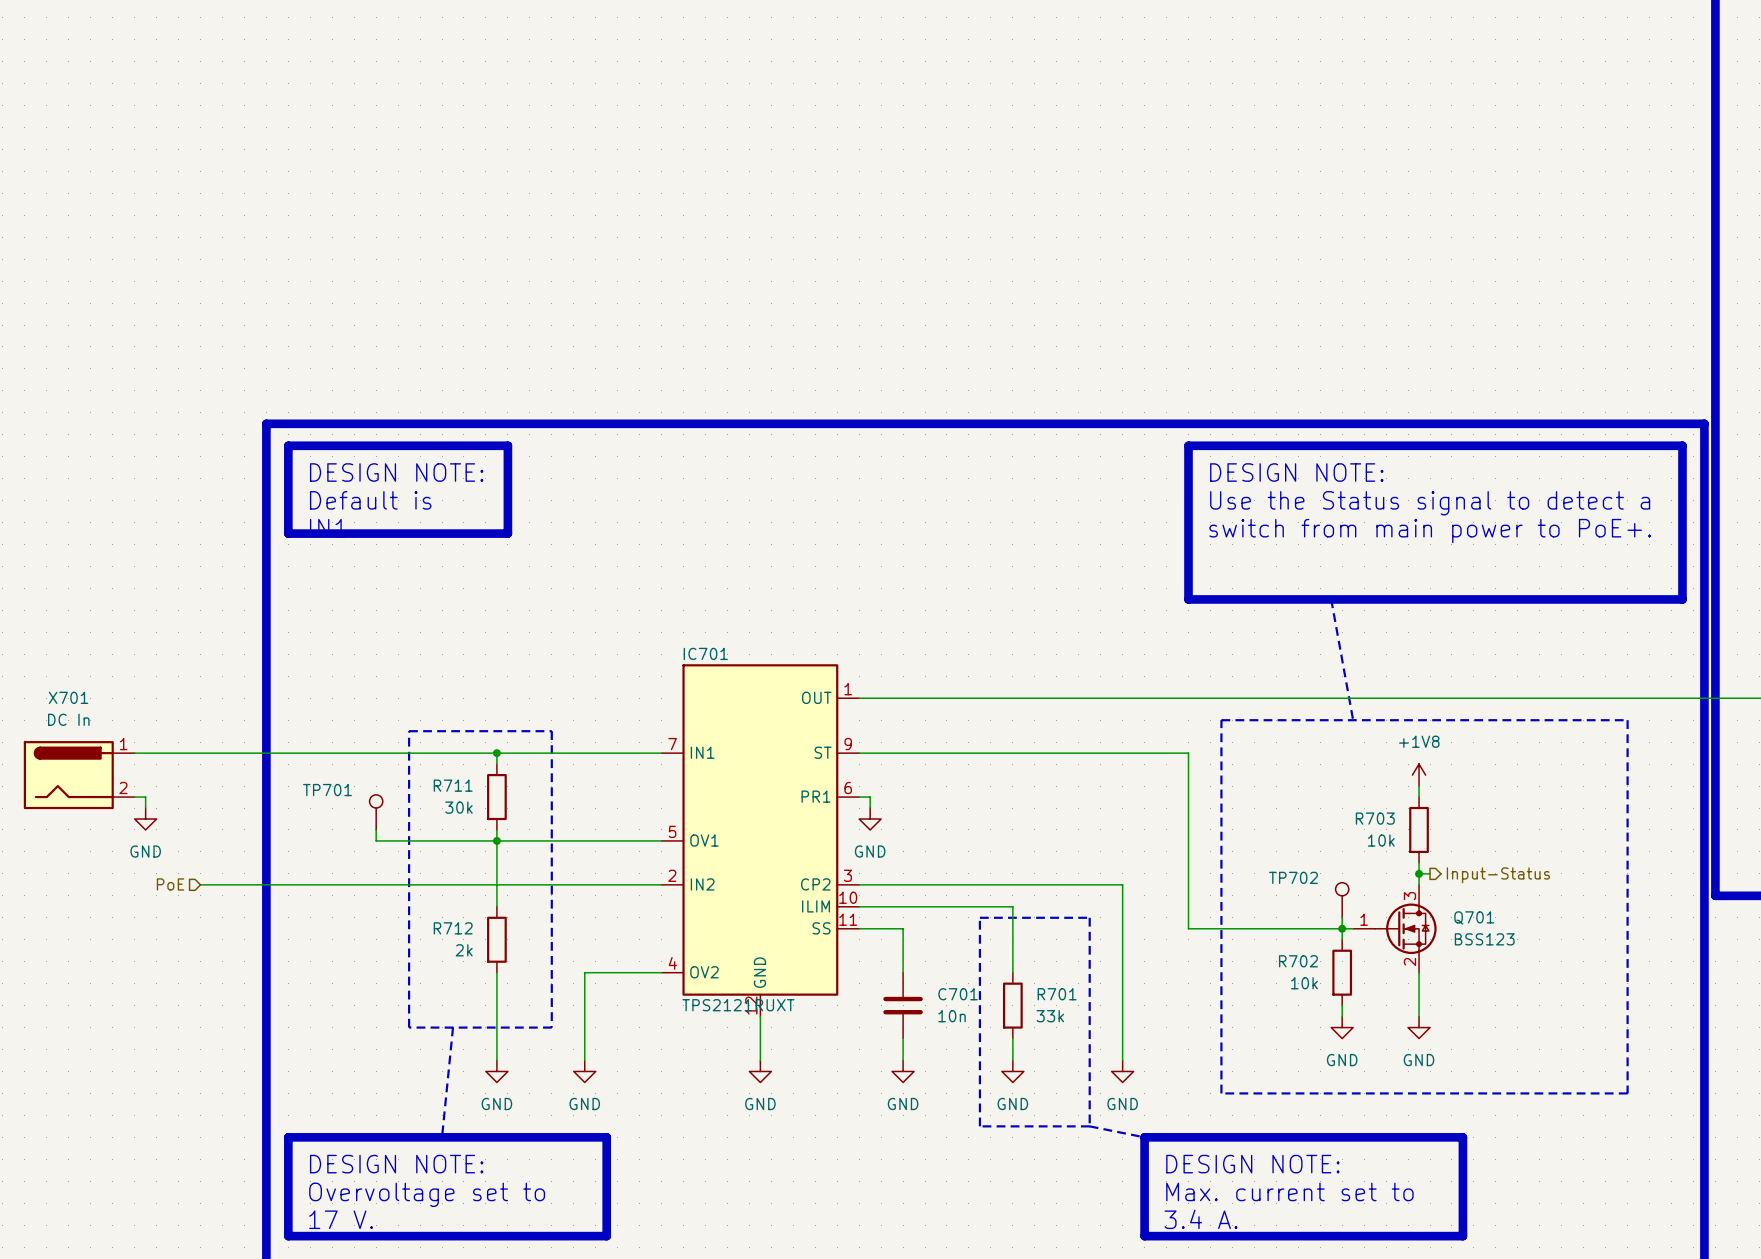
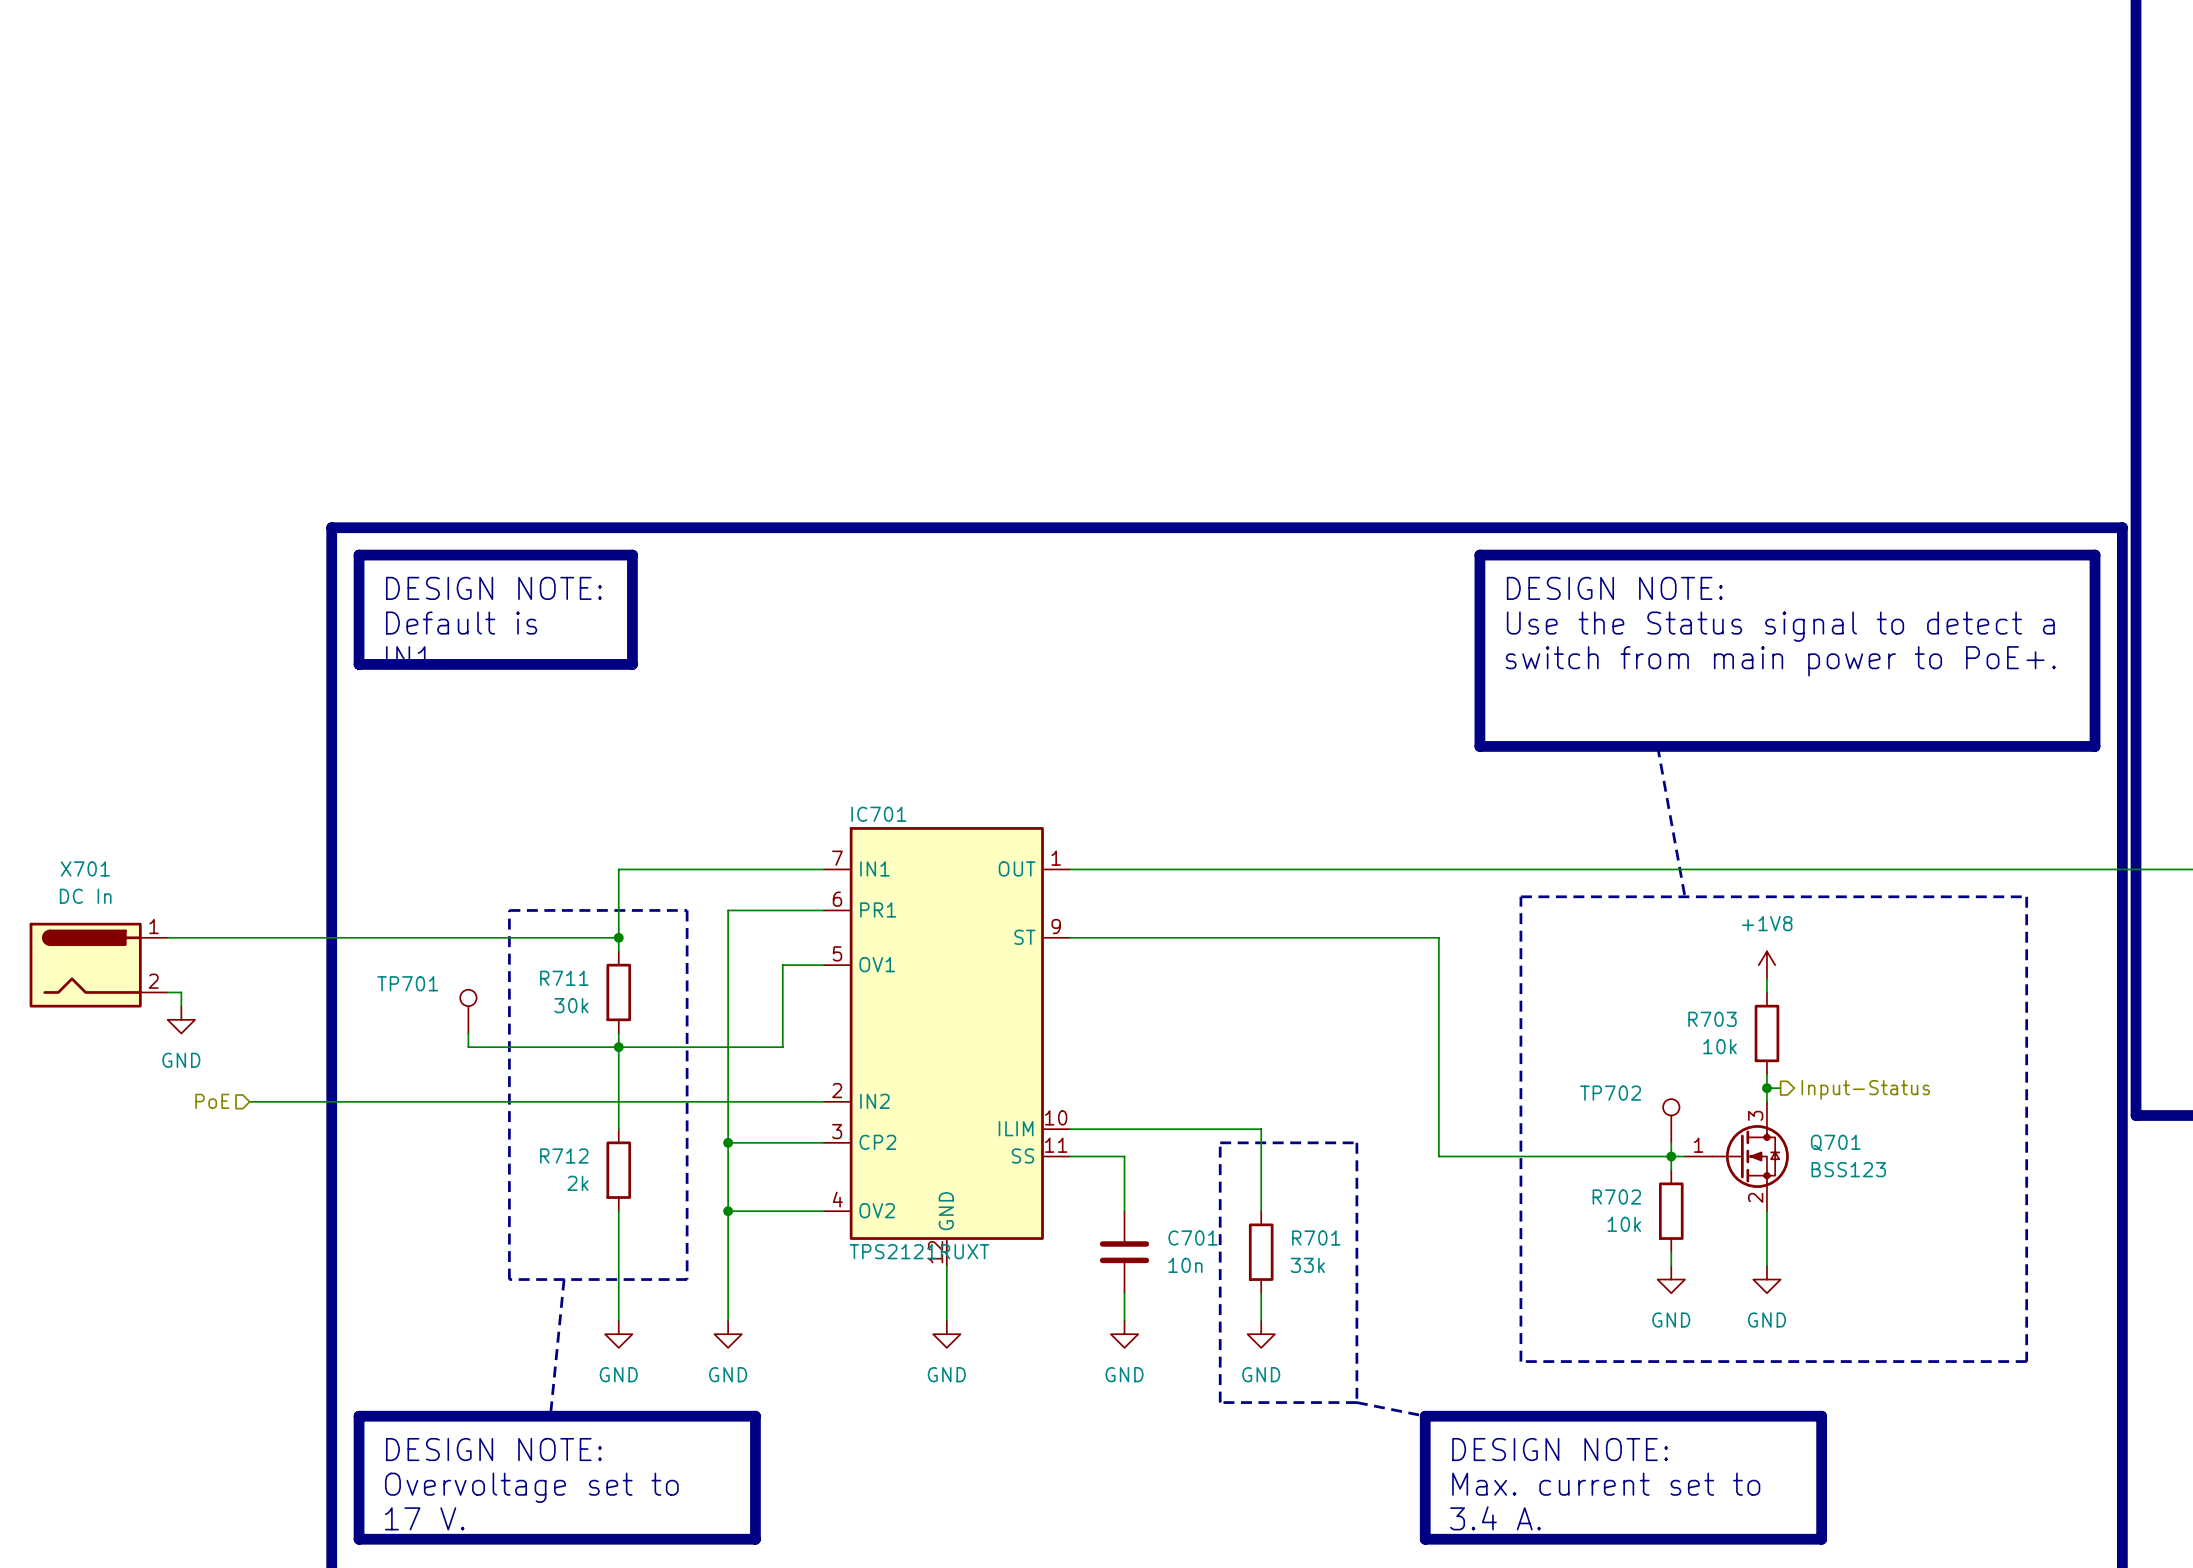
IC701 symbol: [661, 664, 860, 1017] -> [823, 827, 1070, 1266]
wire: none -> (823, 910) (728, 910) (728, 1211)
wire: (496, 753) (661, 753) -> (618, 937) (618, 869) (823, 869)
wire: (1155, 753) (1188, 753) (1188, 928) -> (1438, 937) (1438, 1156) (1479, 1156)
wire: (859, 797) (870, 797) (870, 808) -> none
power symbol: GND (870, 819) -> none
wire: (628, 840) (661, 840) -> (782, 1047) (782, 965) (823, 965)
wire: (859, 884) (1122, 884) (1122, 1060) -> none
wire: none -> (728, 1142) (823, 1142)
junction: none -> (728, 1142)
junction: none -> (728, 1211)
power symbol: GND (1122, 1071) -> none

